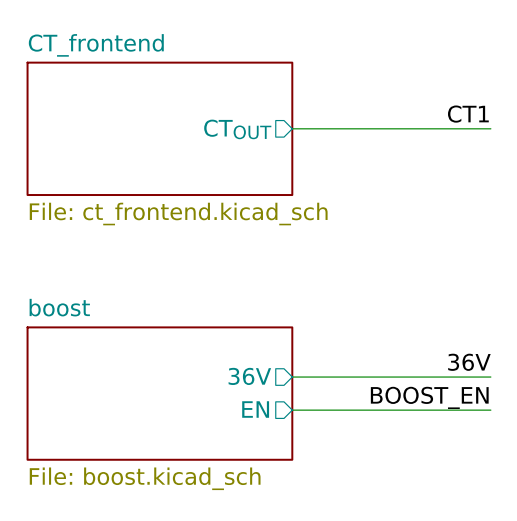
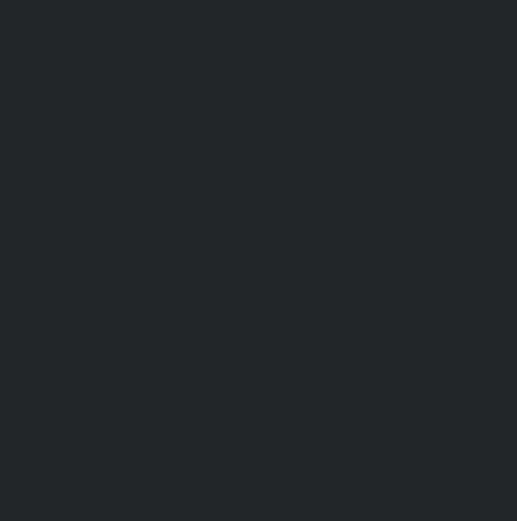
label: CT1 (468, 114) -> none
sheet CT_frontend: File: ct_frontend.kicad_sch (159, 128) -> none
wire: (292, 128) (490, 128) -> none
sheet pin: CTOUT (237, 129) -> none
label: 36V (469, 362) -> none
sheet pin: 36V (249, 376) -> none
wire: (292, 377) (490, 377) -> none
sheet boost: File: boost.kicad_sch (159, 393) -> none
label: BOOST_EN (429, 397) -> none
sheet pin: EN (255, 409) -> none
wire: (292, 410) (490, 410) -> none

